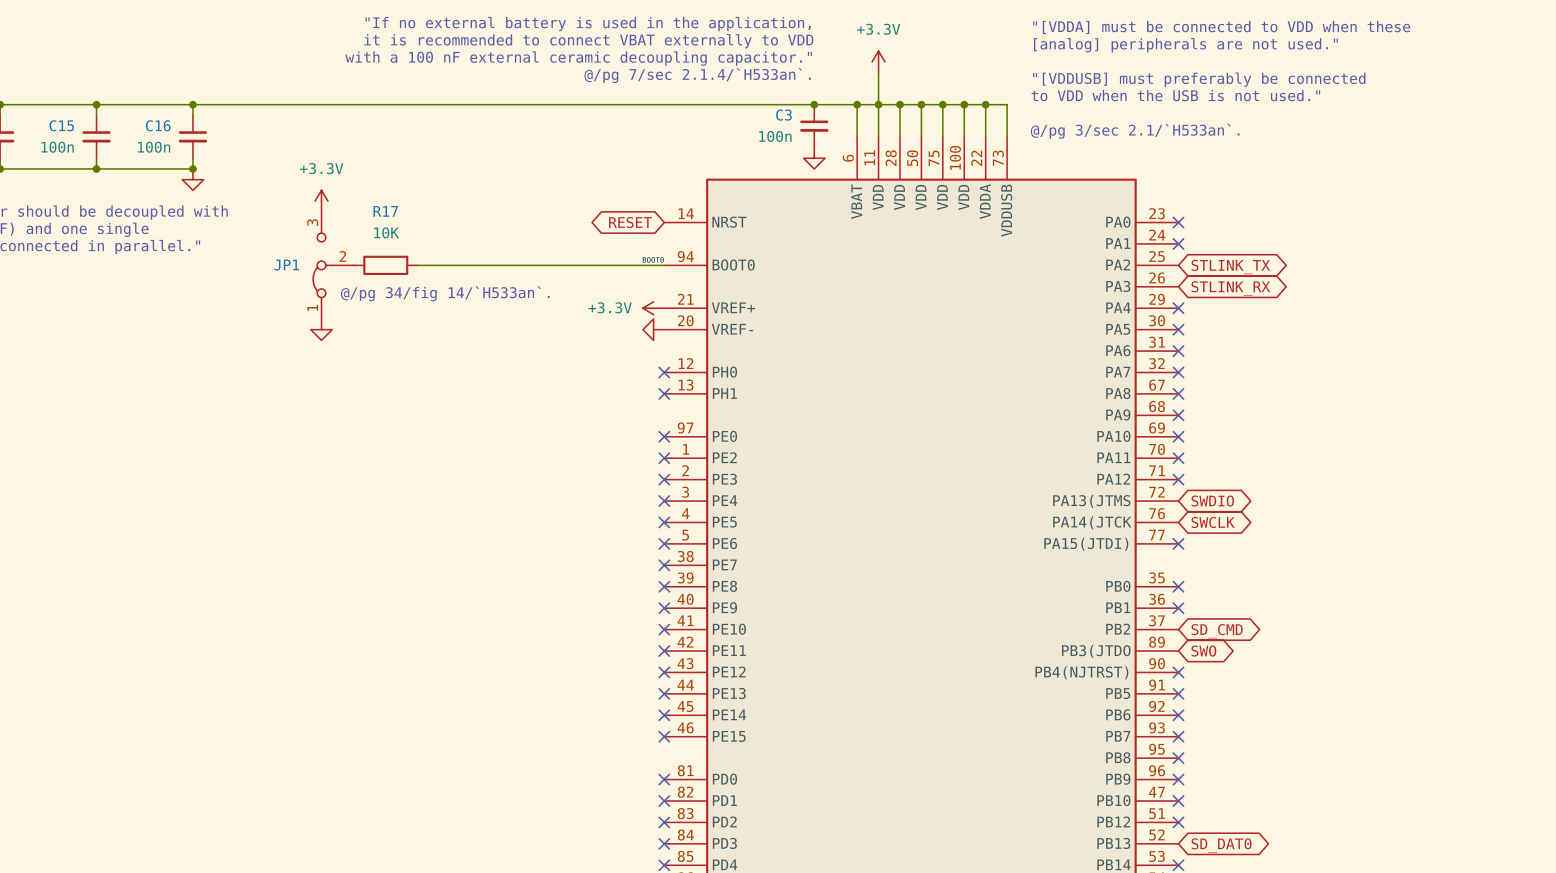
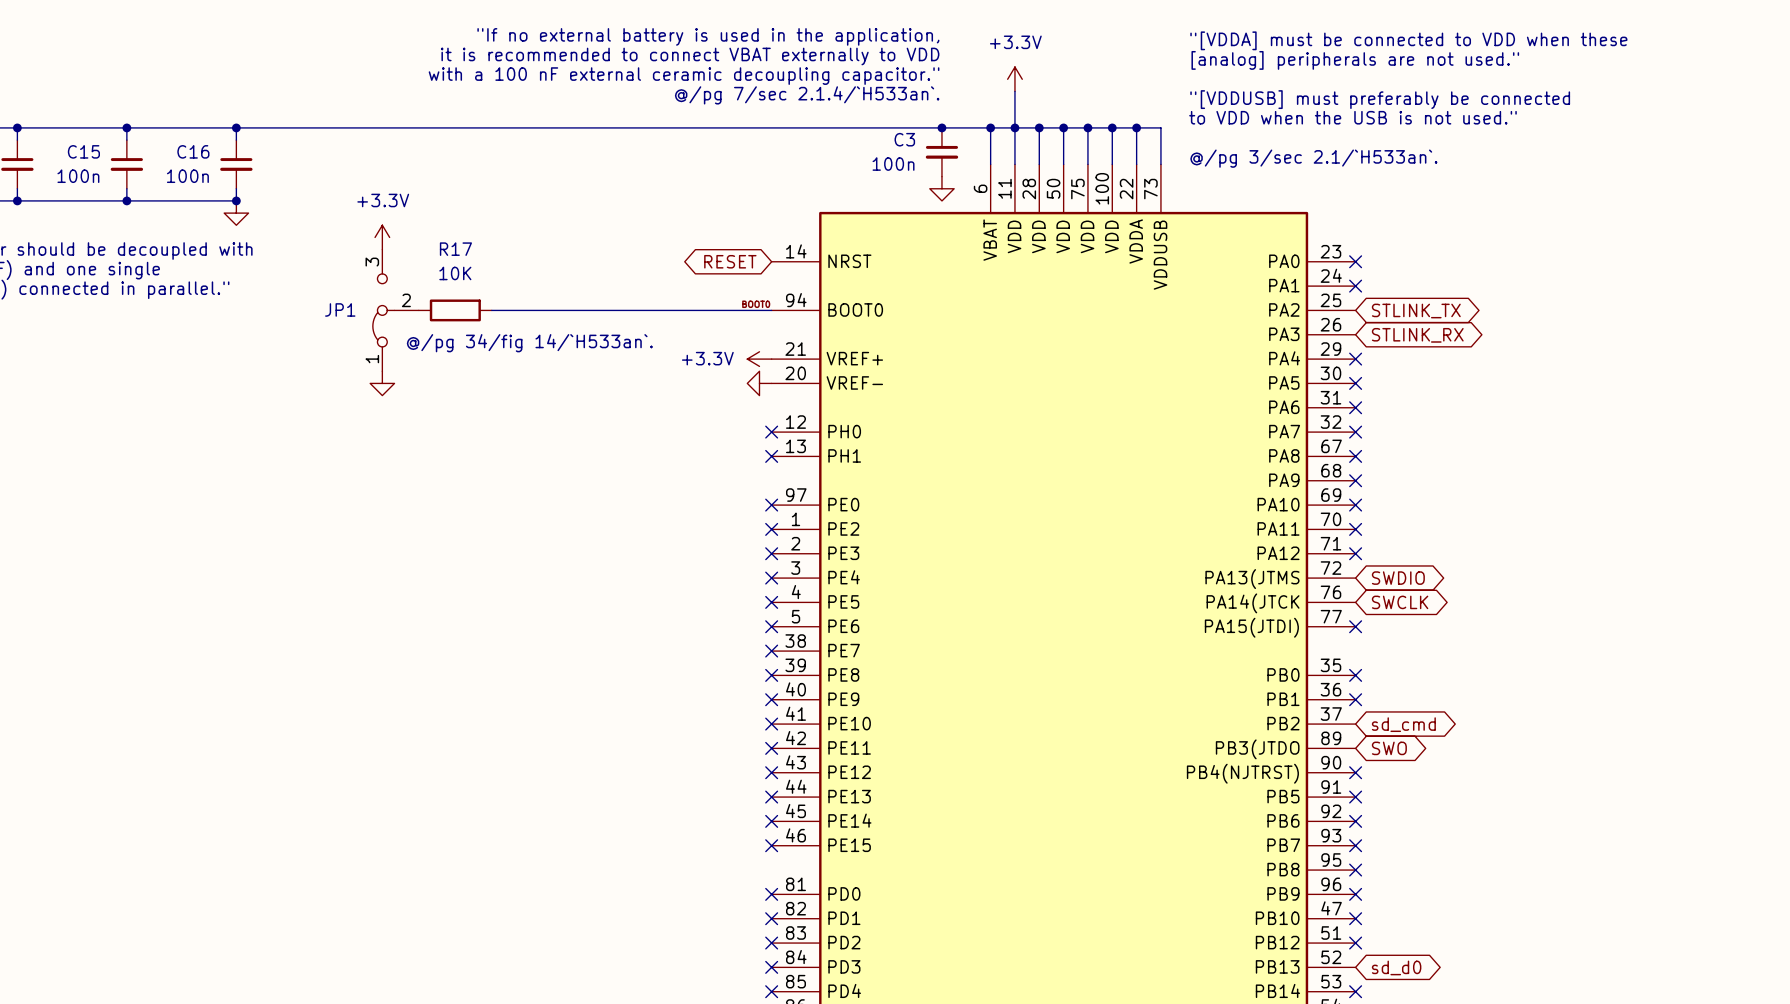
global label: SD_CMD (1217, 631) -> sd_cmd (1403, 724)
global label: SD_DAT0 (1221, 845) -> sd_d0 (1396, 967)

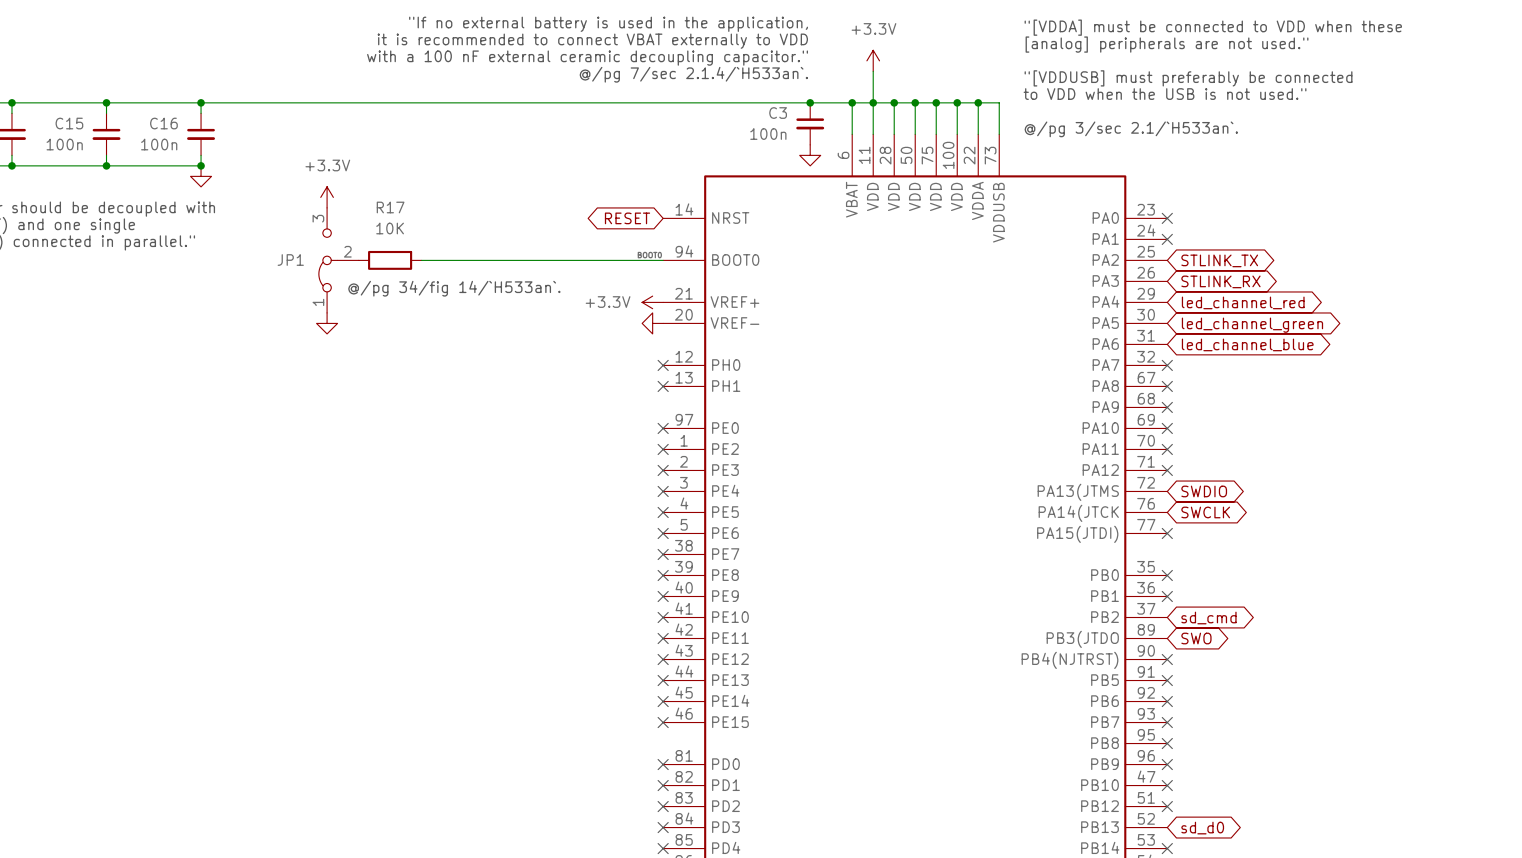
no-connect mark: (1355, 359) -> none
global label: none -> led_channel_red (1243, 302)
no-connect mark: (1355, 383) -> none
global label: none -> led_channel_green (1252, 325)
no-connect mark: (1355, 407) -> none
global label: none -> led_channel_blue (1247, 344)

